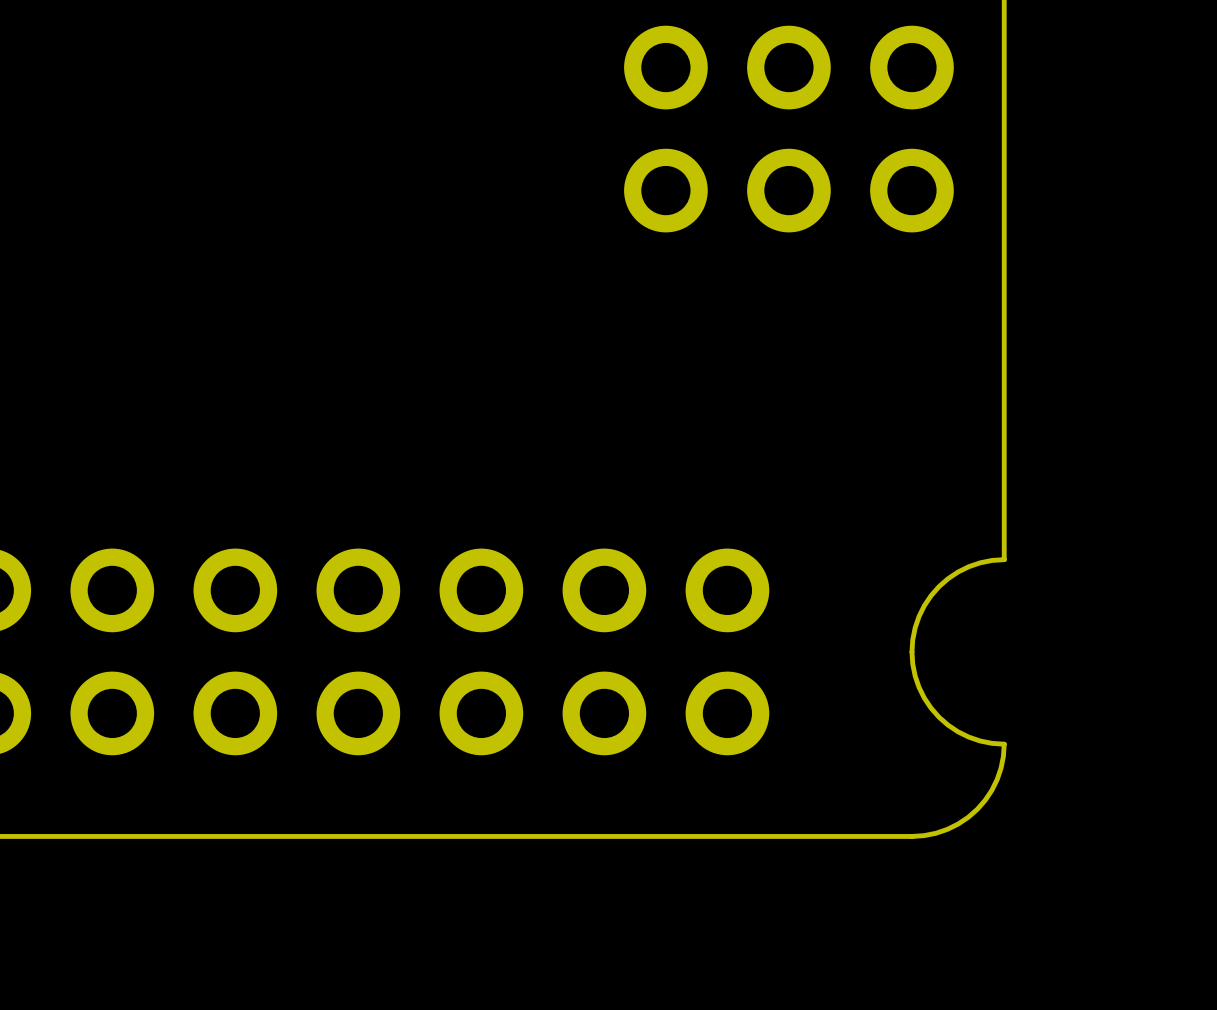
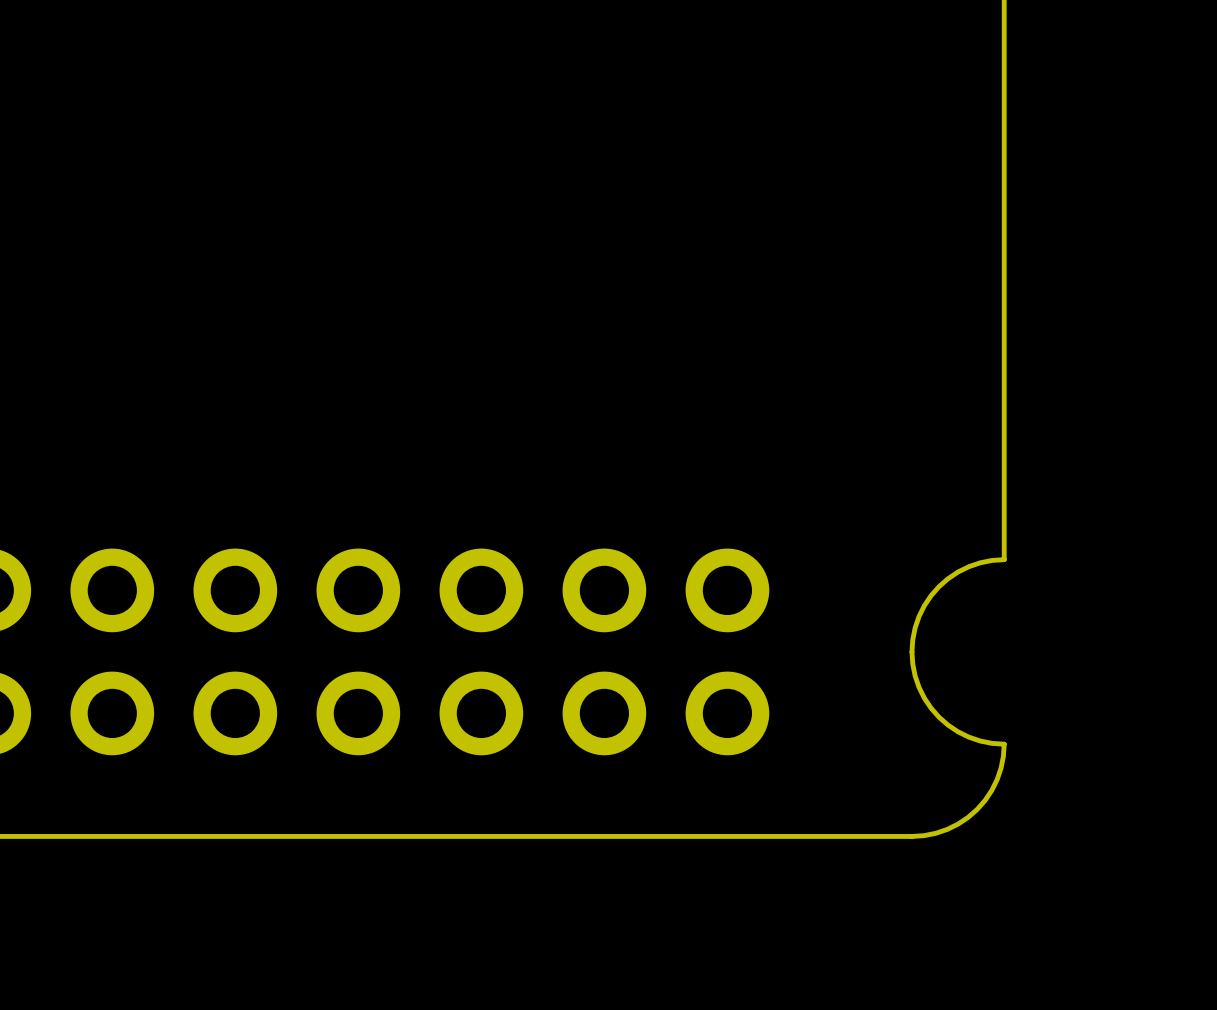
part: (788, 129) -> none

